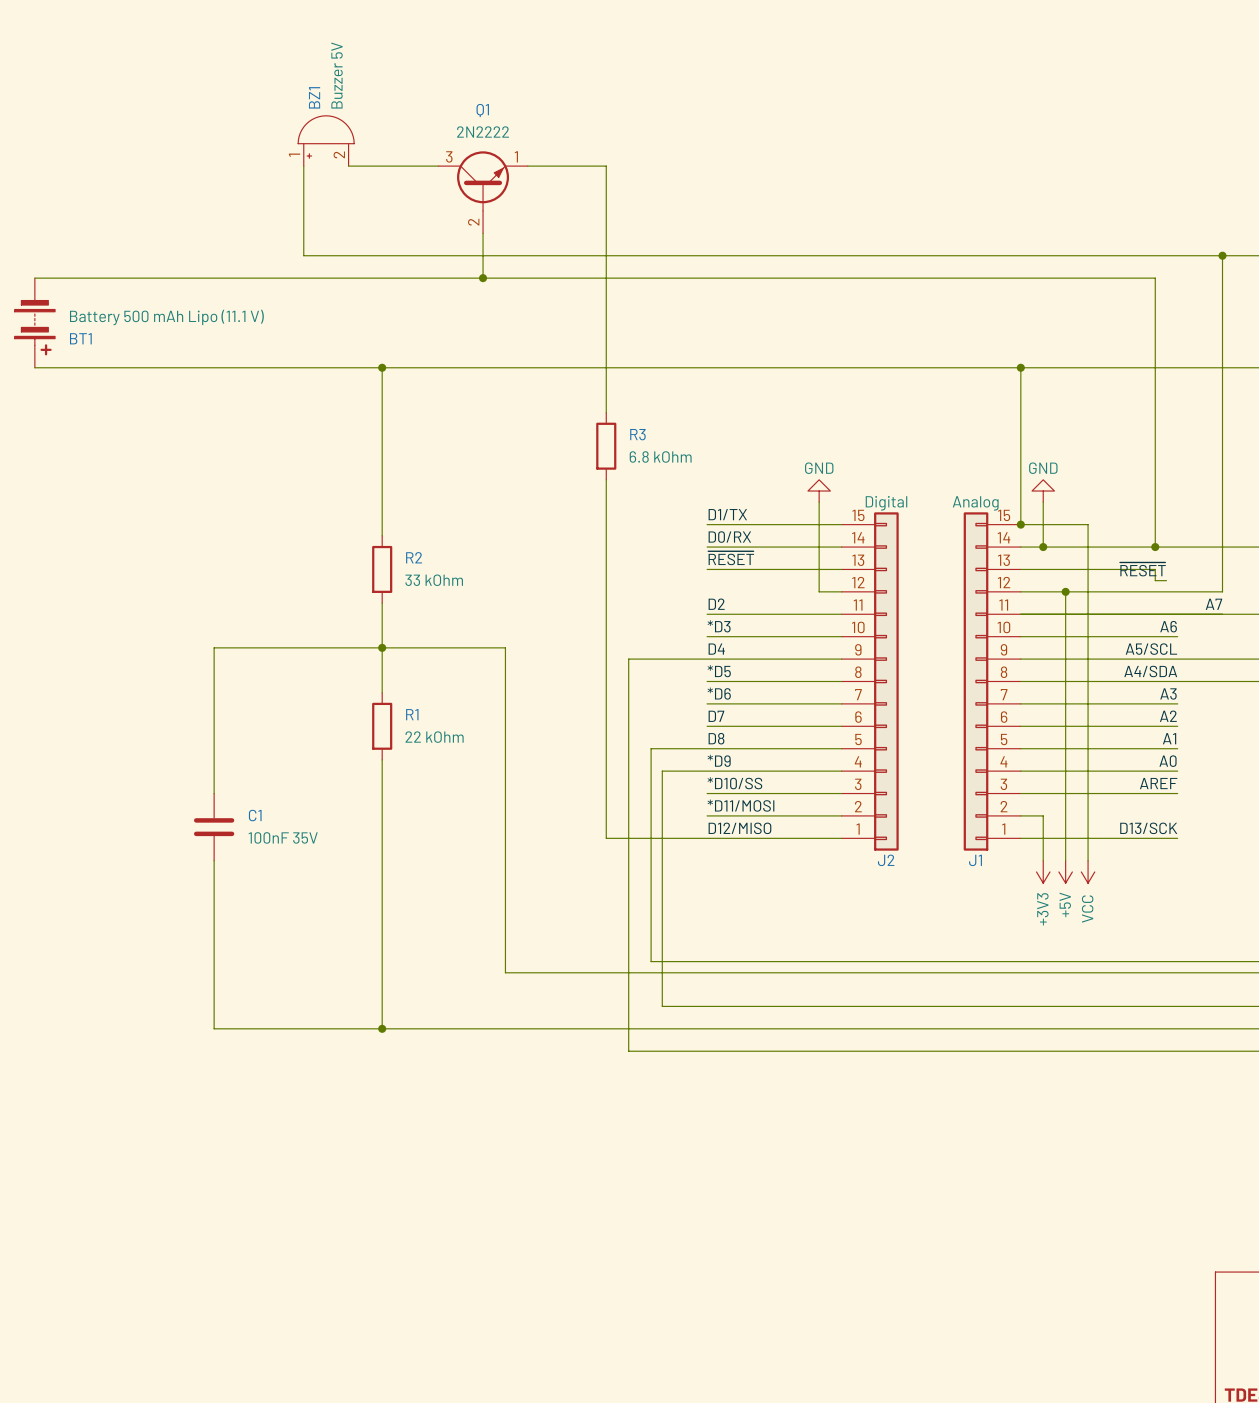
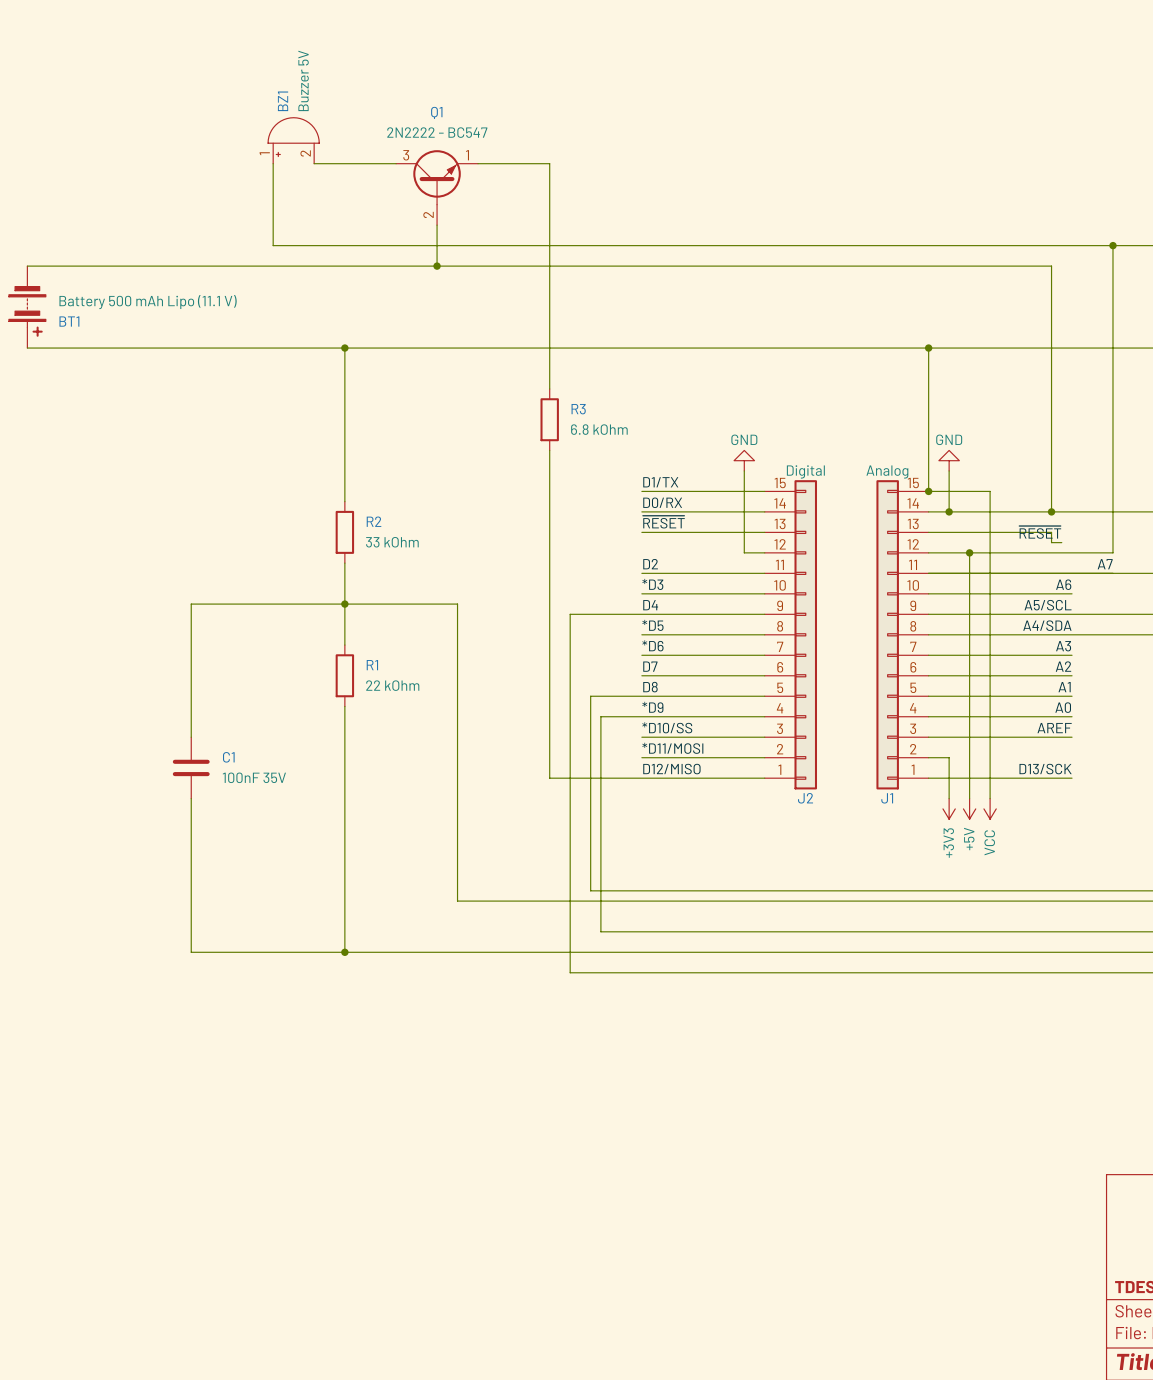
Q1 value: 2N2222 (483, 132) -> 2N2222 - BC547 (437, 132)

